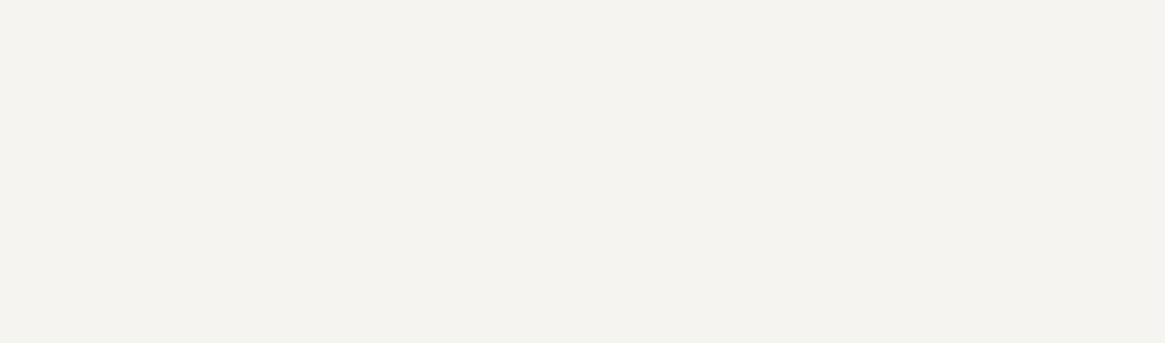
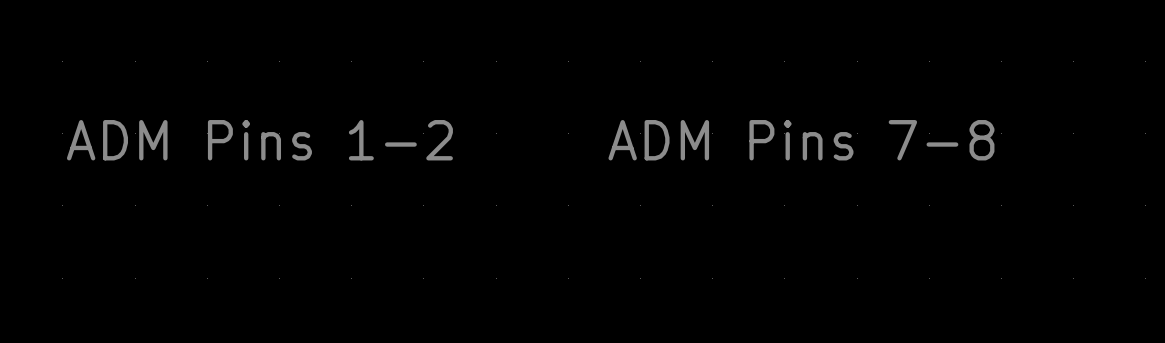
text: none -> ADM Pins 1-2 (259, 140)
text: none -> ADM Pins 7-8 (801, 140)

